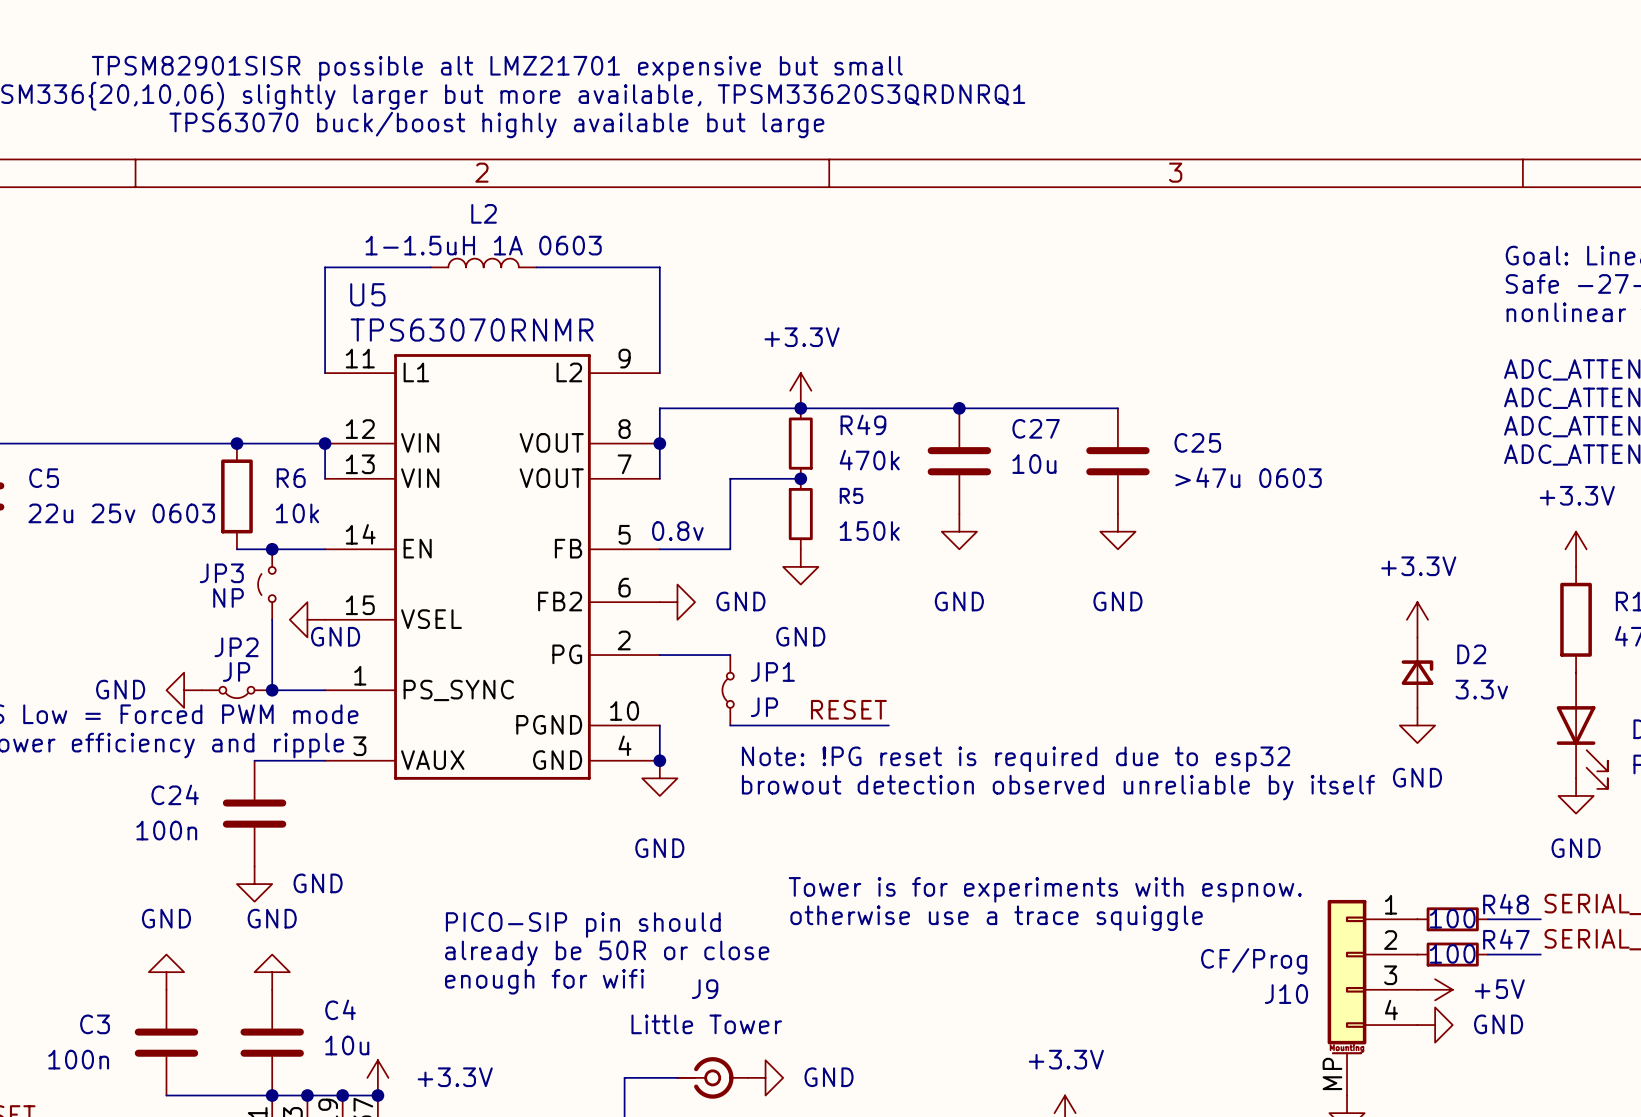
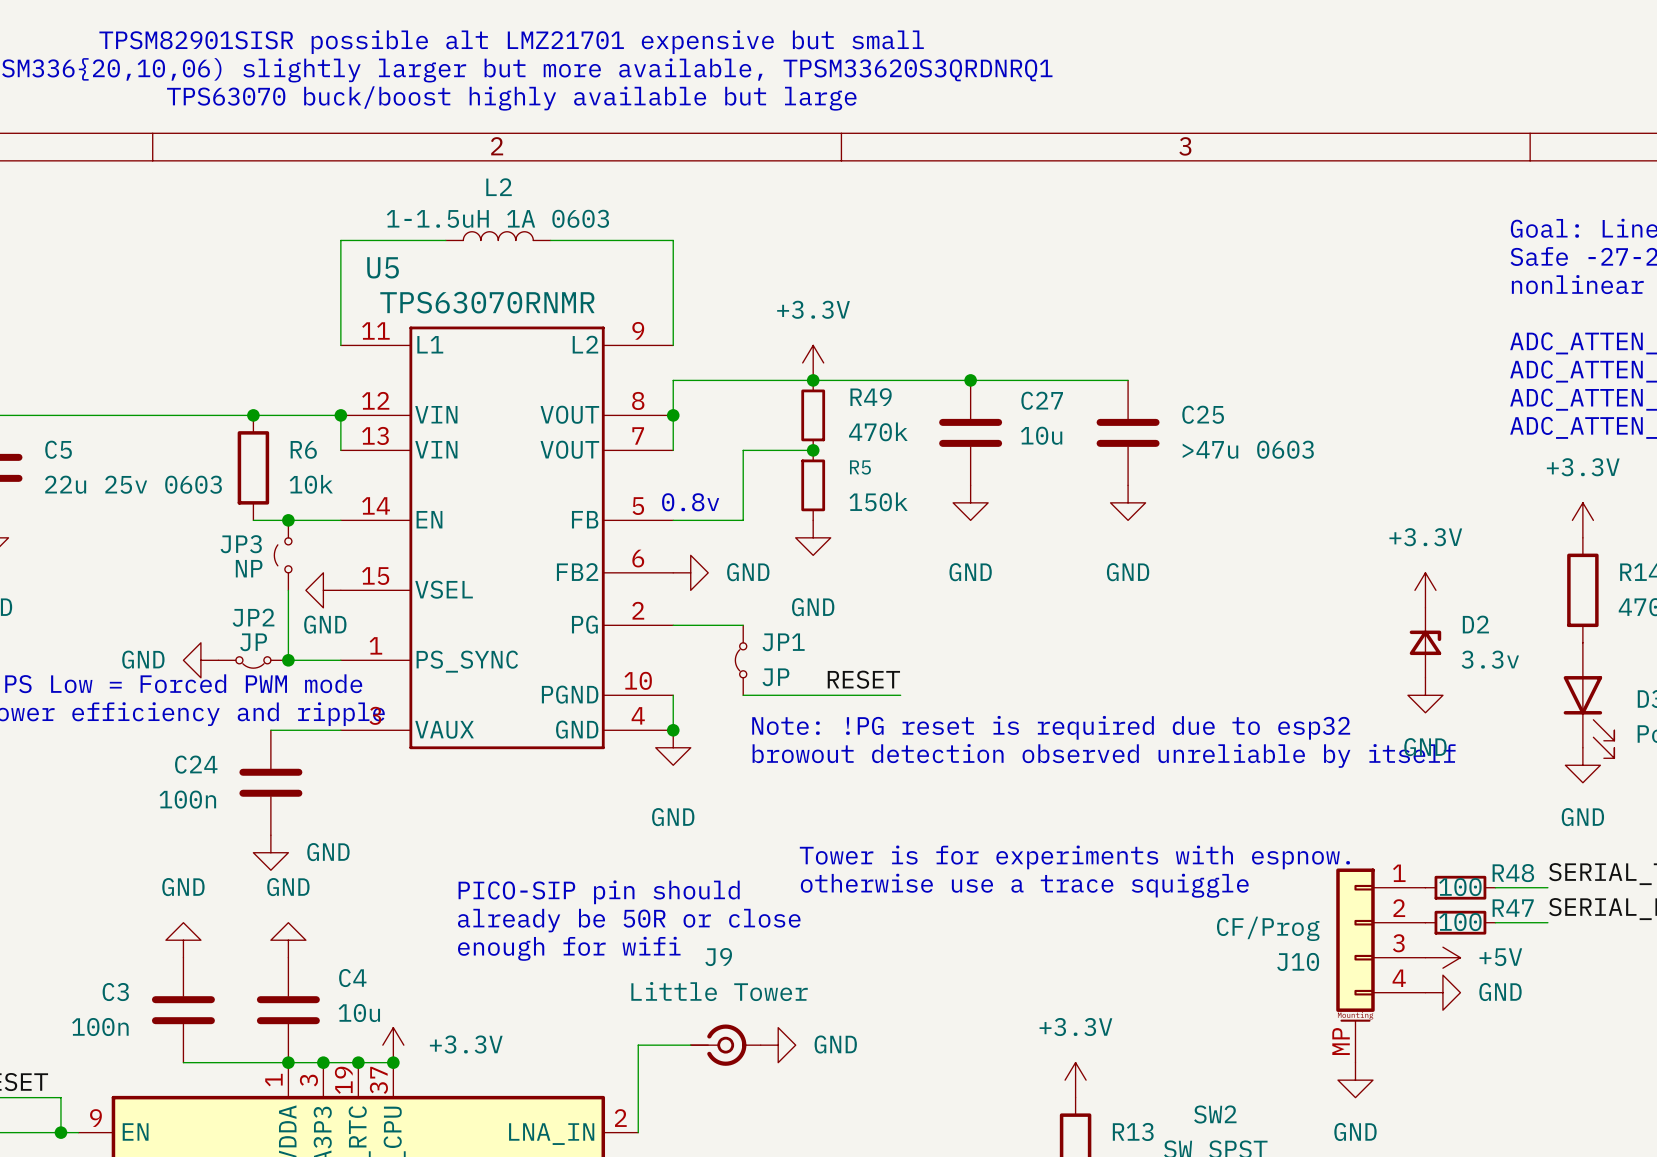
power symbol text position: GND (335, 636) -> GND (325, 624)

